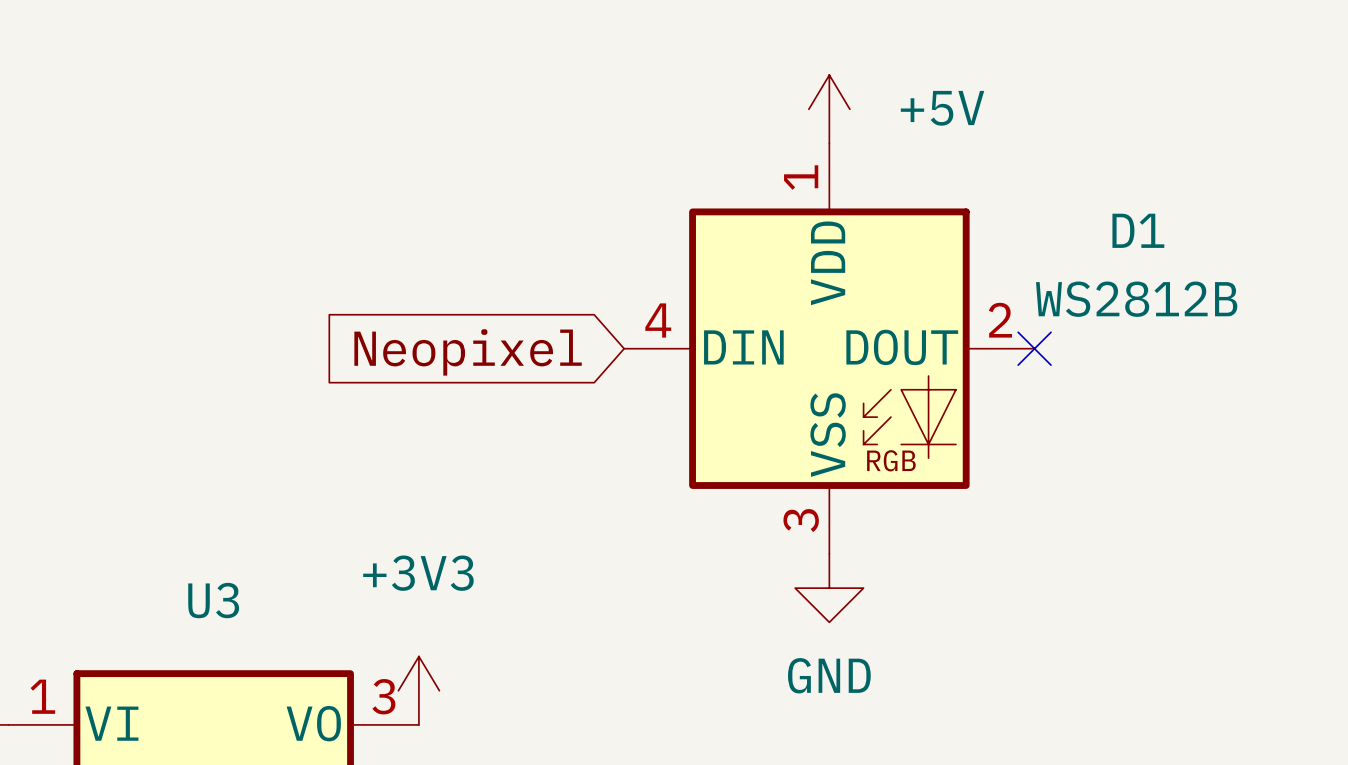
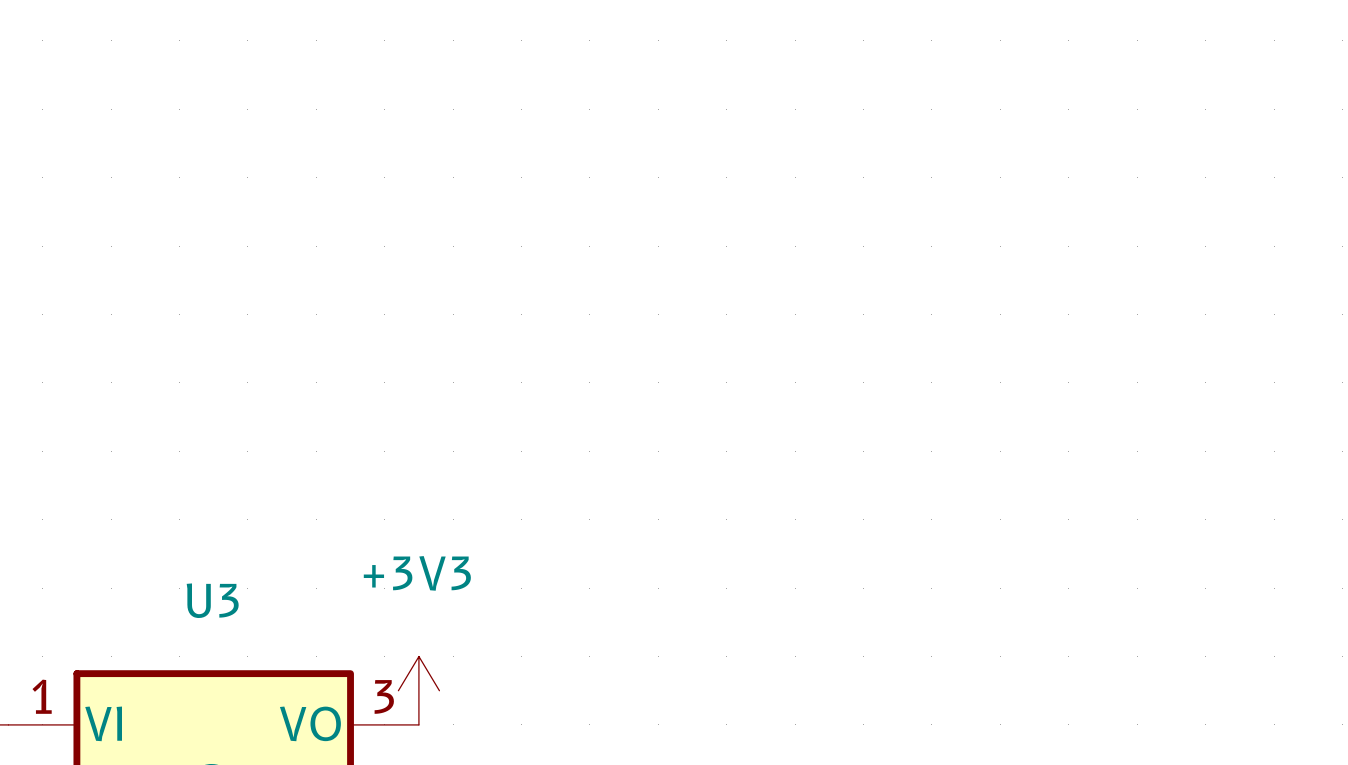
power symbol: +5V (829, 109) -> none
D1: WS2812B (829, 348) -> none
no-connect mark: (1034, 348) -> none
global label: Neopixel (468, 352) -> none
power symbol: GND (829, 588) -> none

